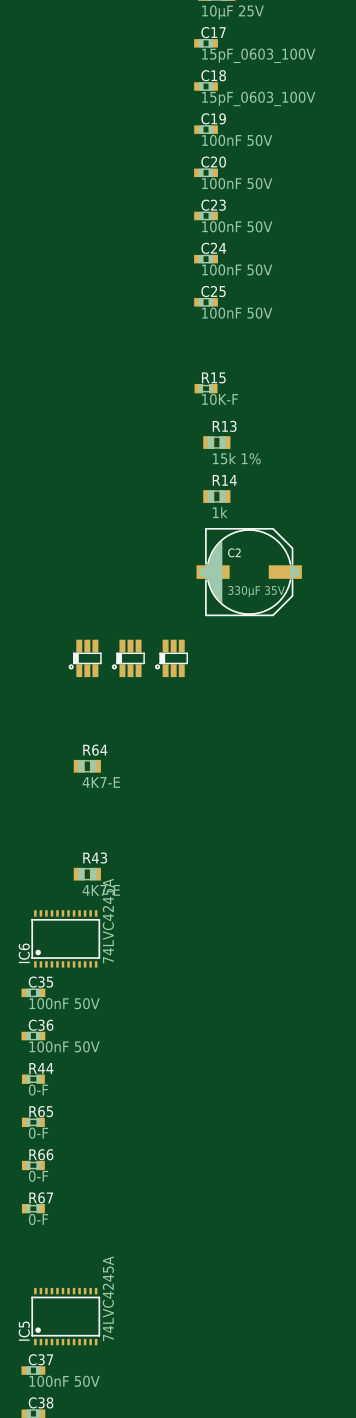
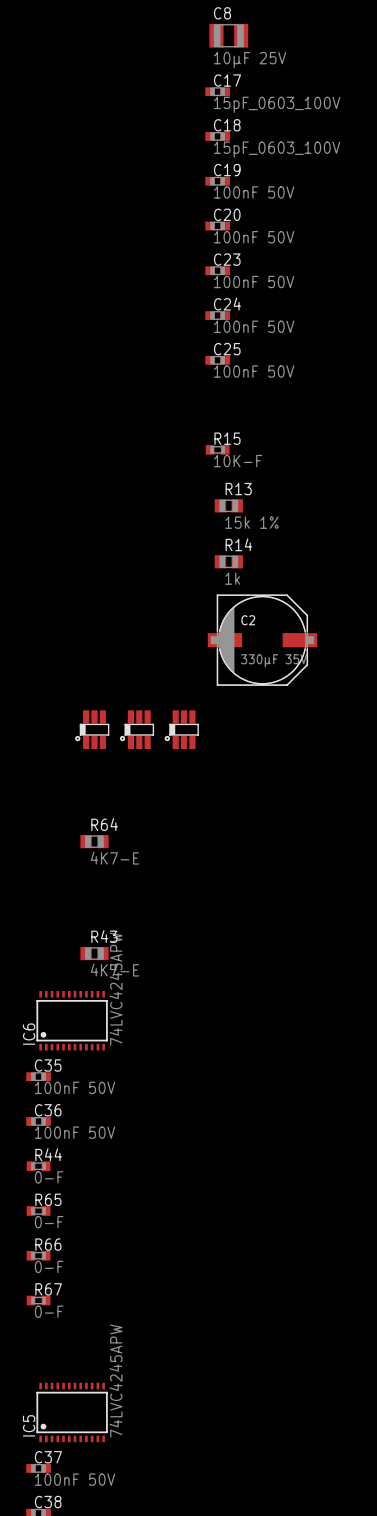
IC6 value: 74LVC4245A (108, 921) -> 74LVC4245APW (116, 989)
IC5 value: 74LVC4245A (108, 1298) -> 74LVC4245APW (116, 1381)

